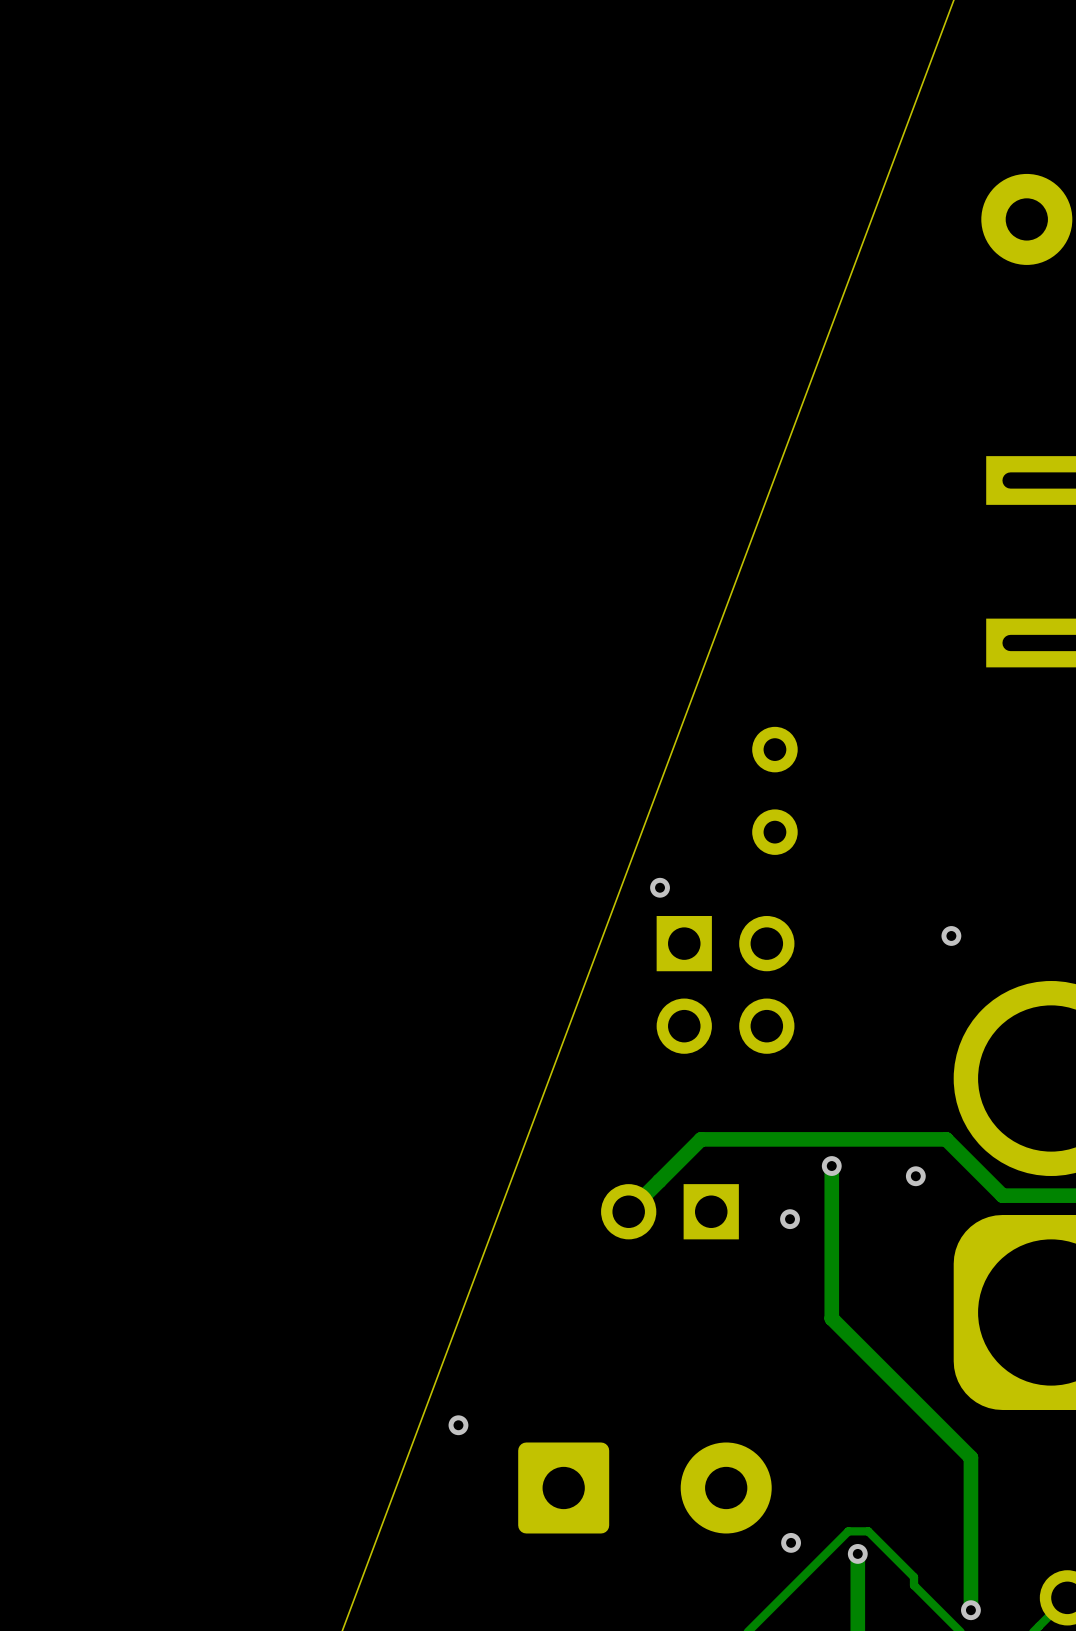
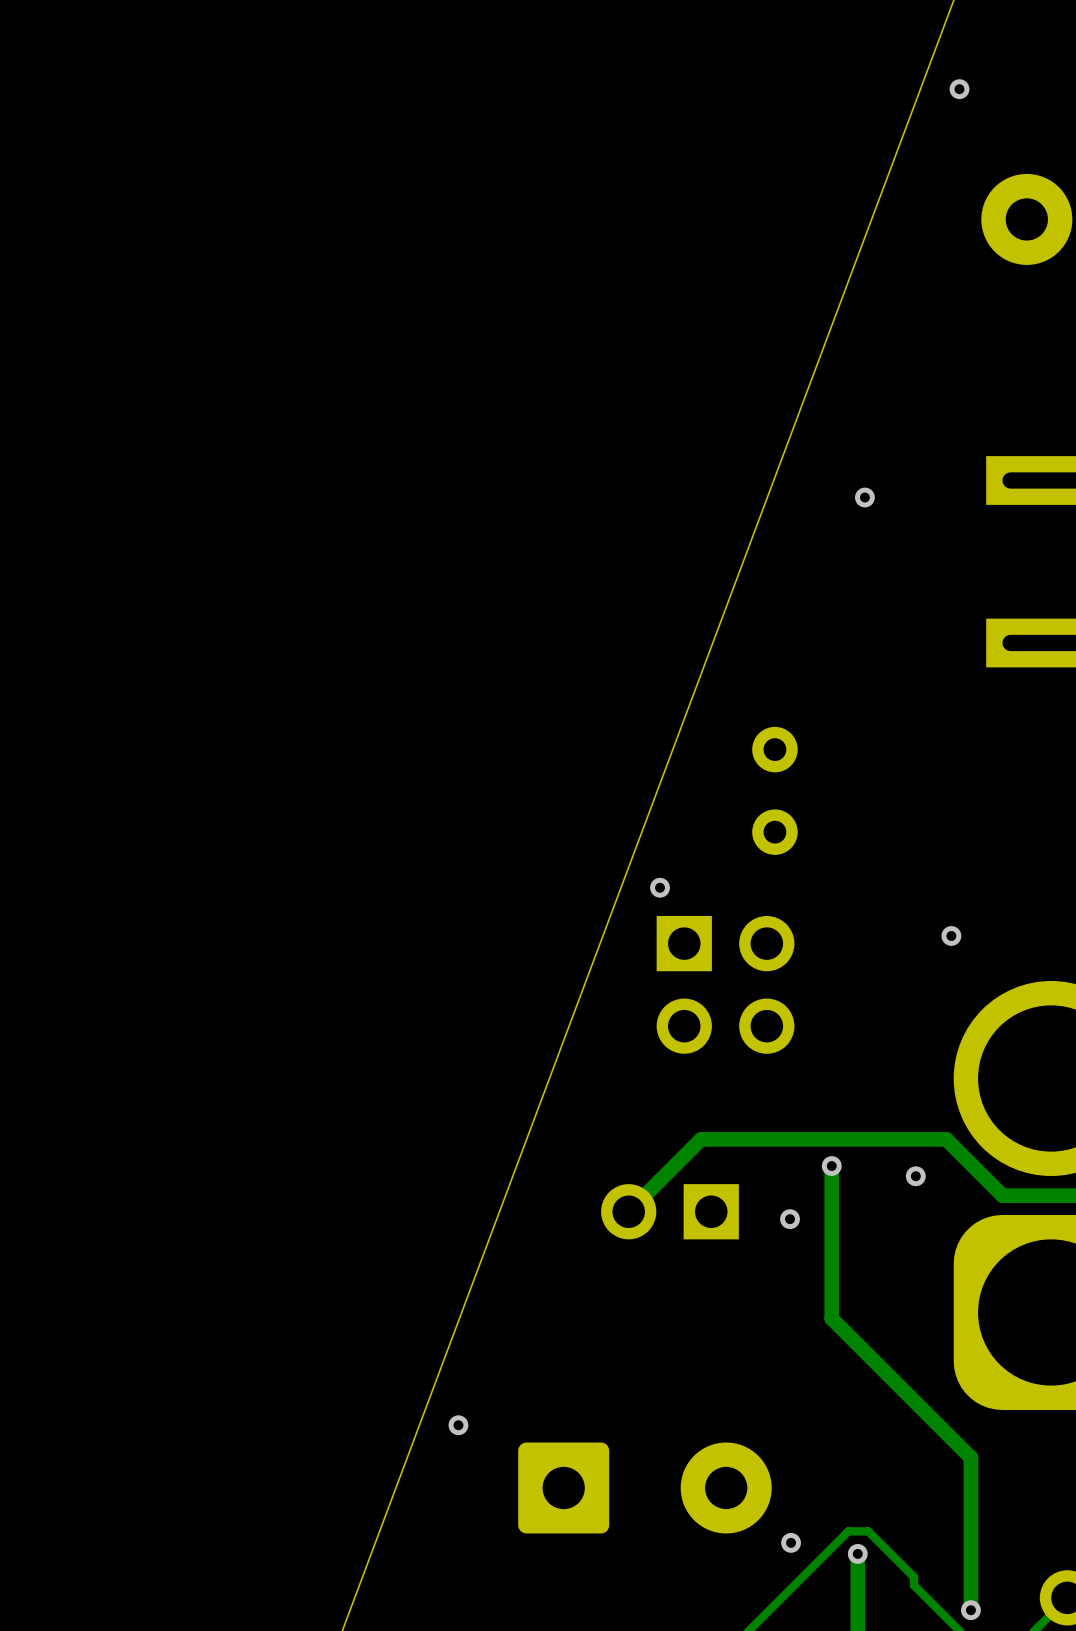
via: none -> (959, 89)
via: none -> (864, 497)

